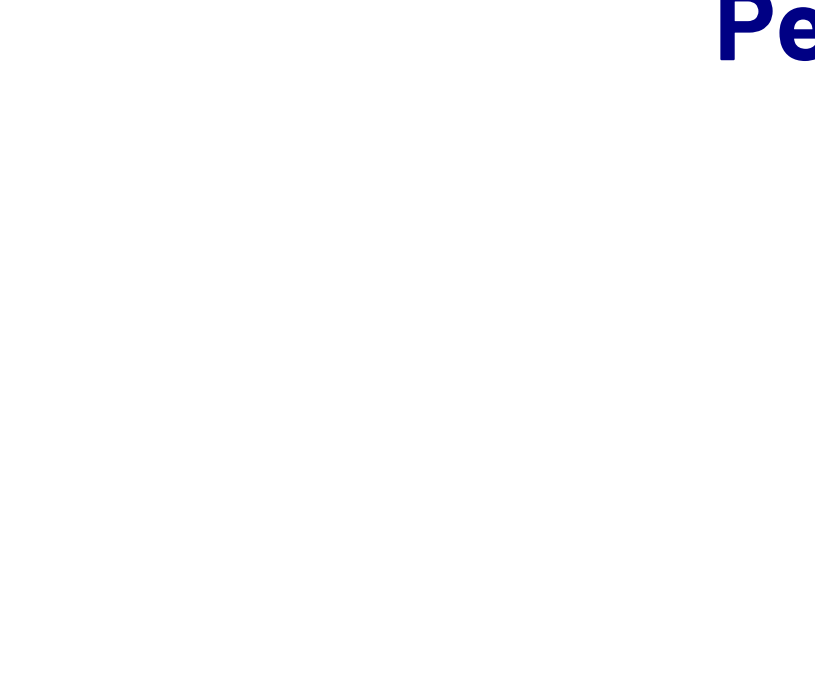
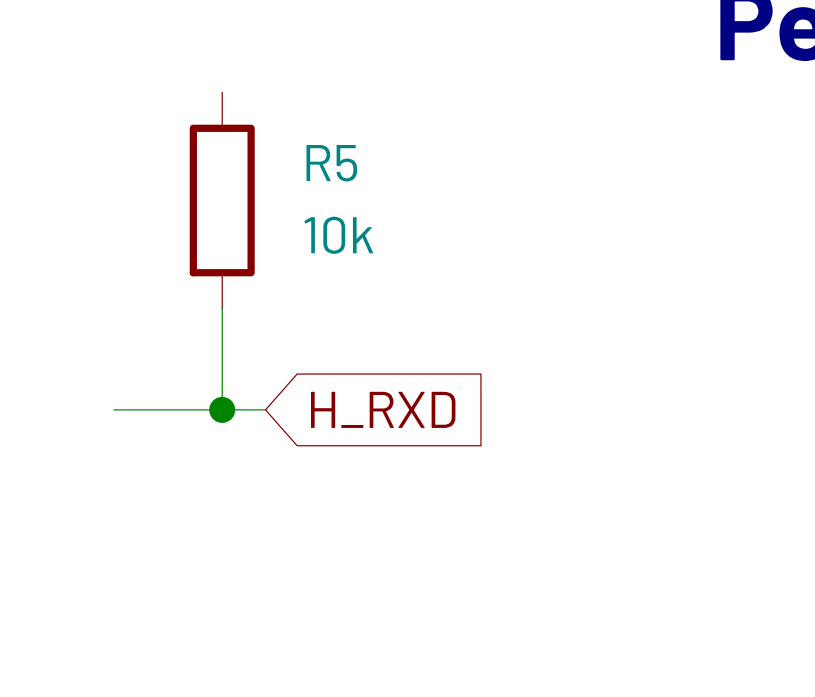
R5: none -> 10k (222, 200)
wire: none -> (222, 308) (222, 409)
wire: none -> (113, 409) (265, 409)
junction: none -> (222, 409)
global label: none -> H_RXD (383, 409)

